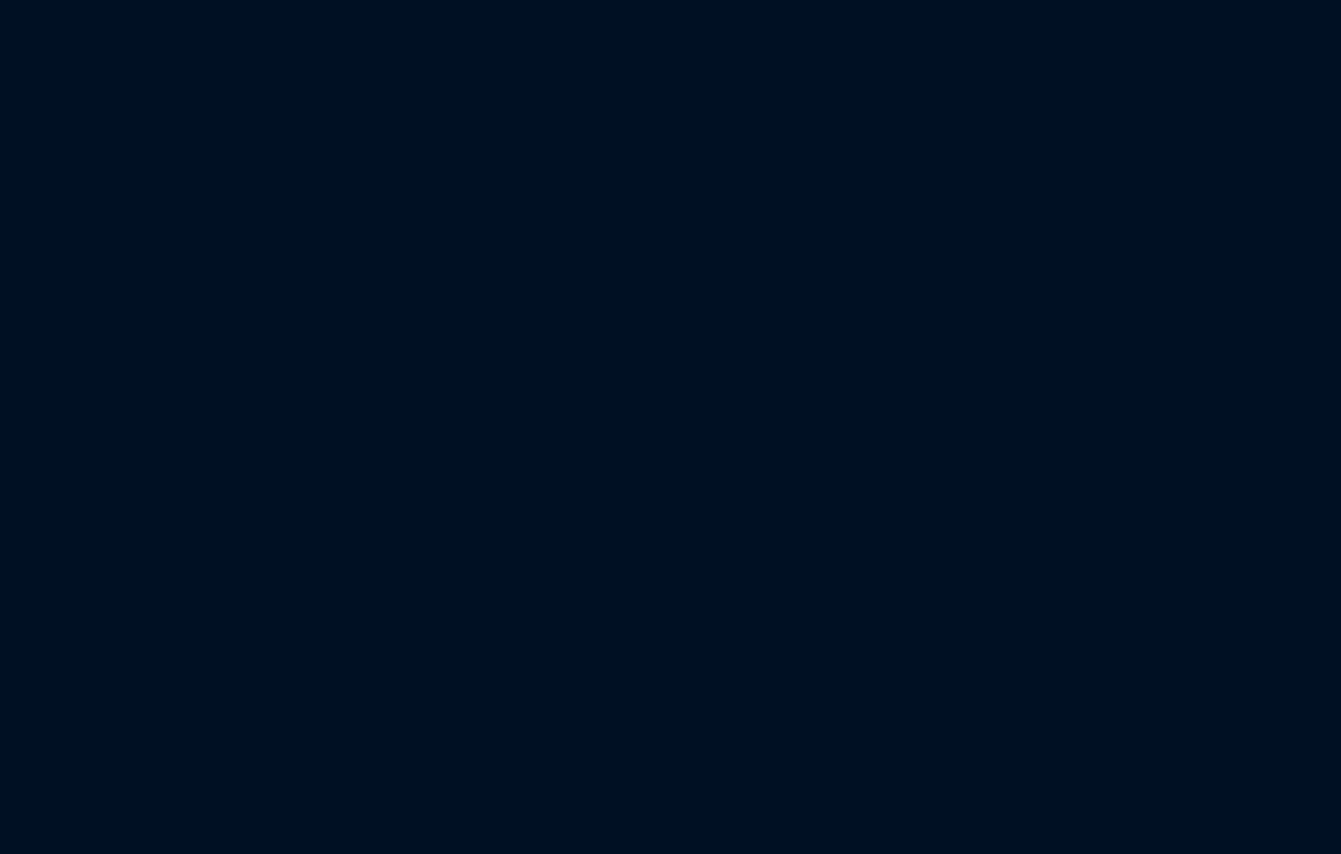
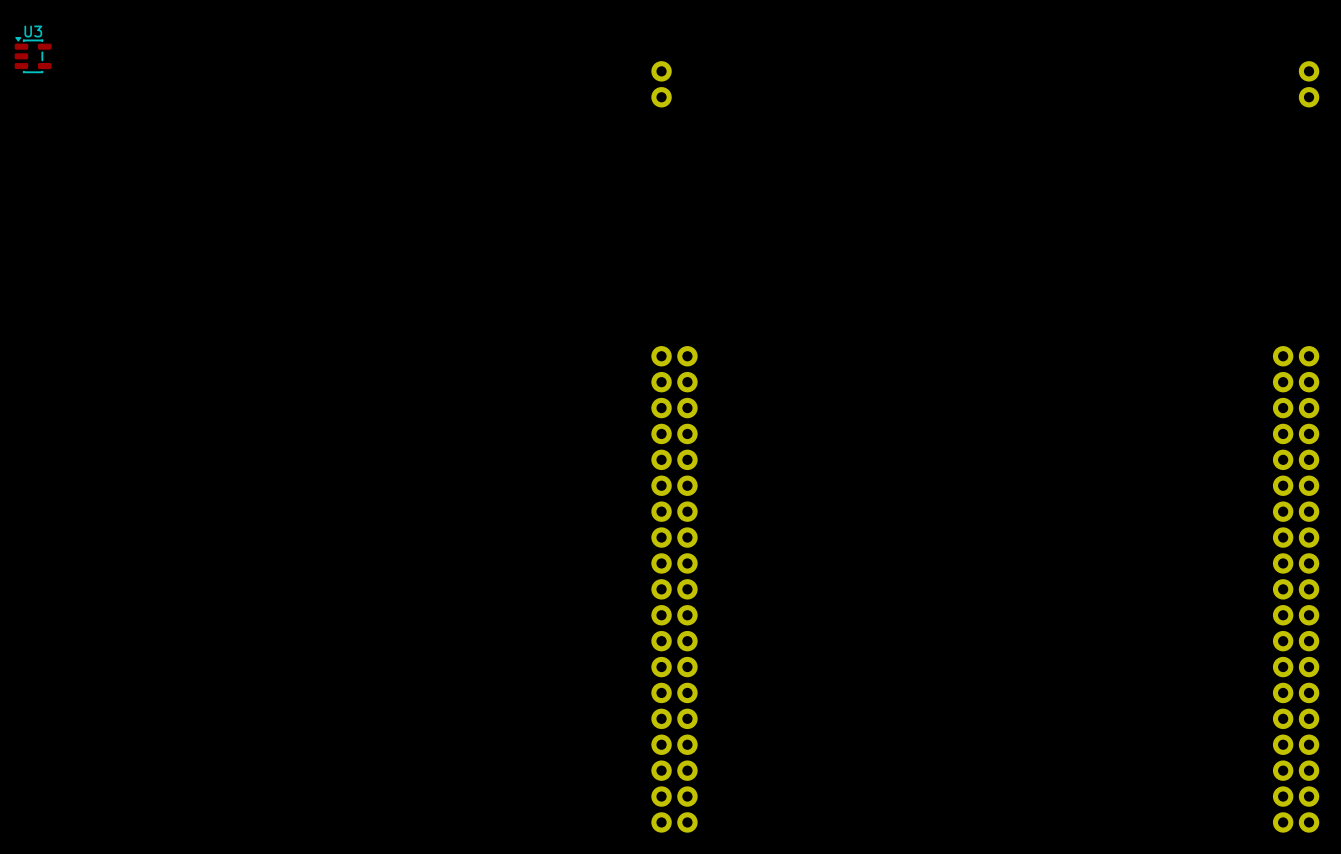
U3: none -> (33, 54)
part: none -> (661, 84)
part: none -> (1309, 84)
part: none -> (674, 589)
part: none -> (1296, 589)

